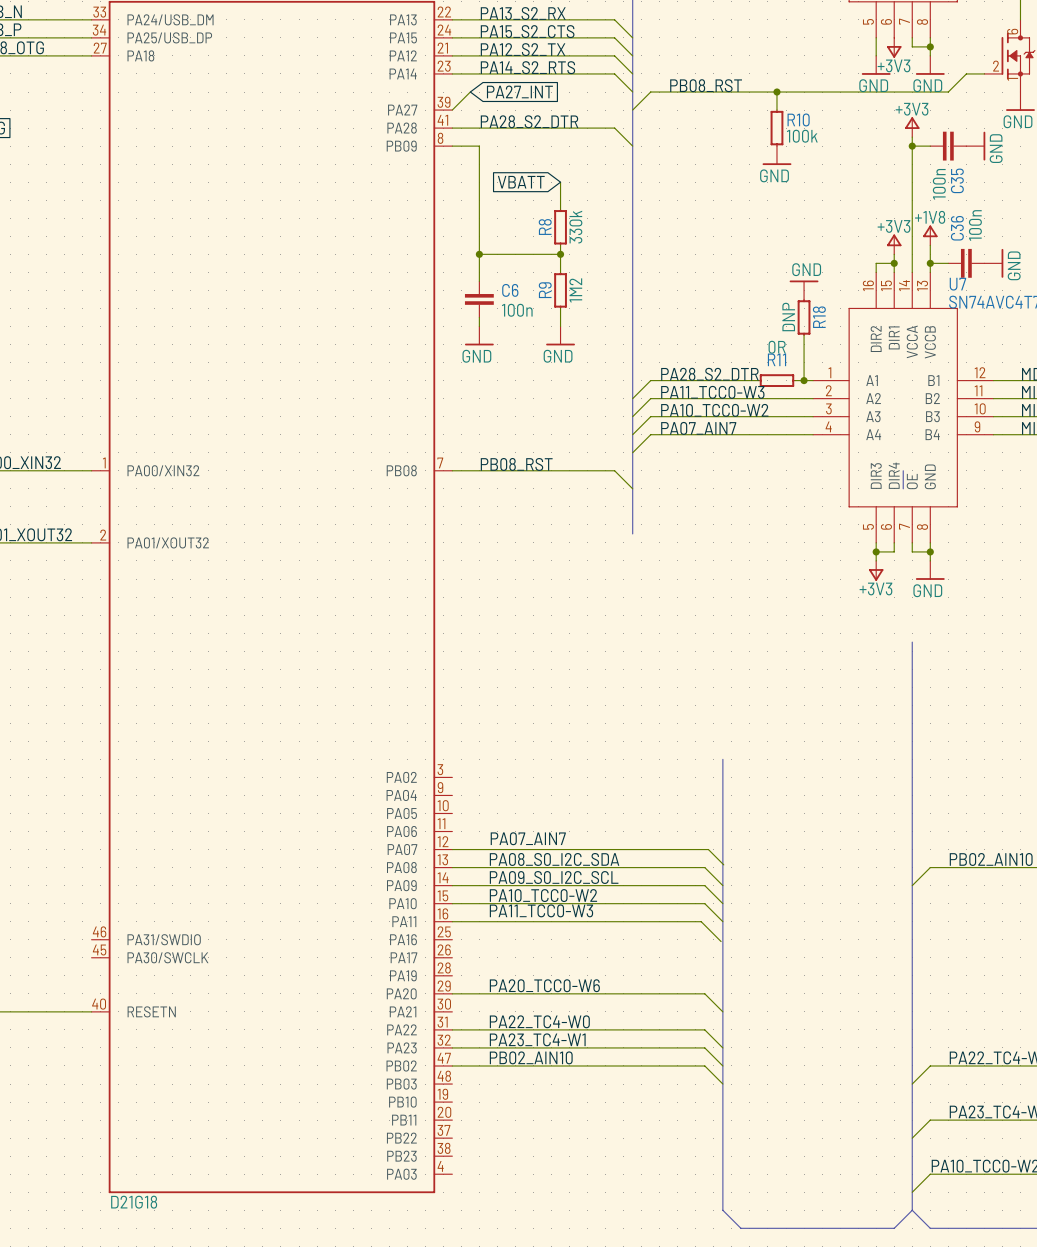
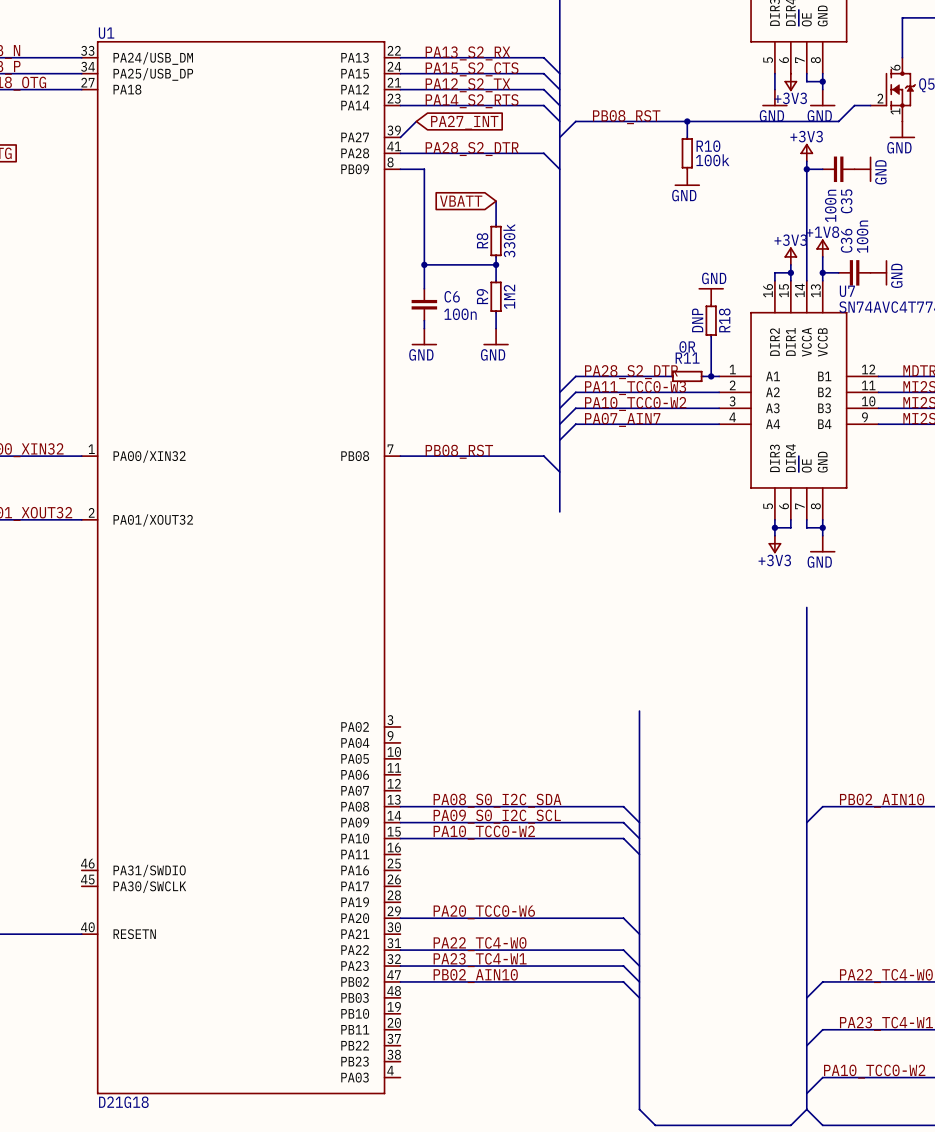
label: PA07_AIN7 (528, 838) -> none
wire: (452, 849) (708, 849) (723, 864) -> none
label: PA11_TCC0-W3 (541, 910) -> none
wire: (452, 921) (701, 921) (721, 941) -> none

